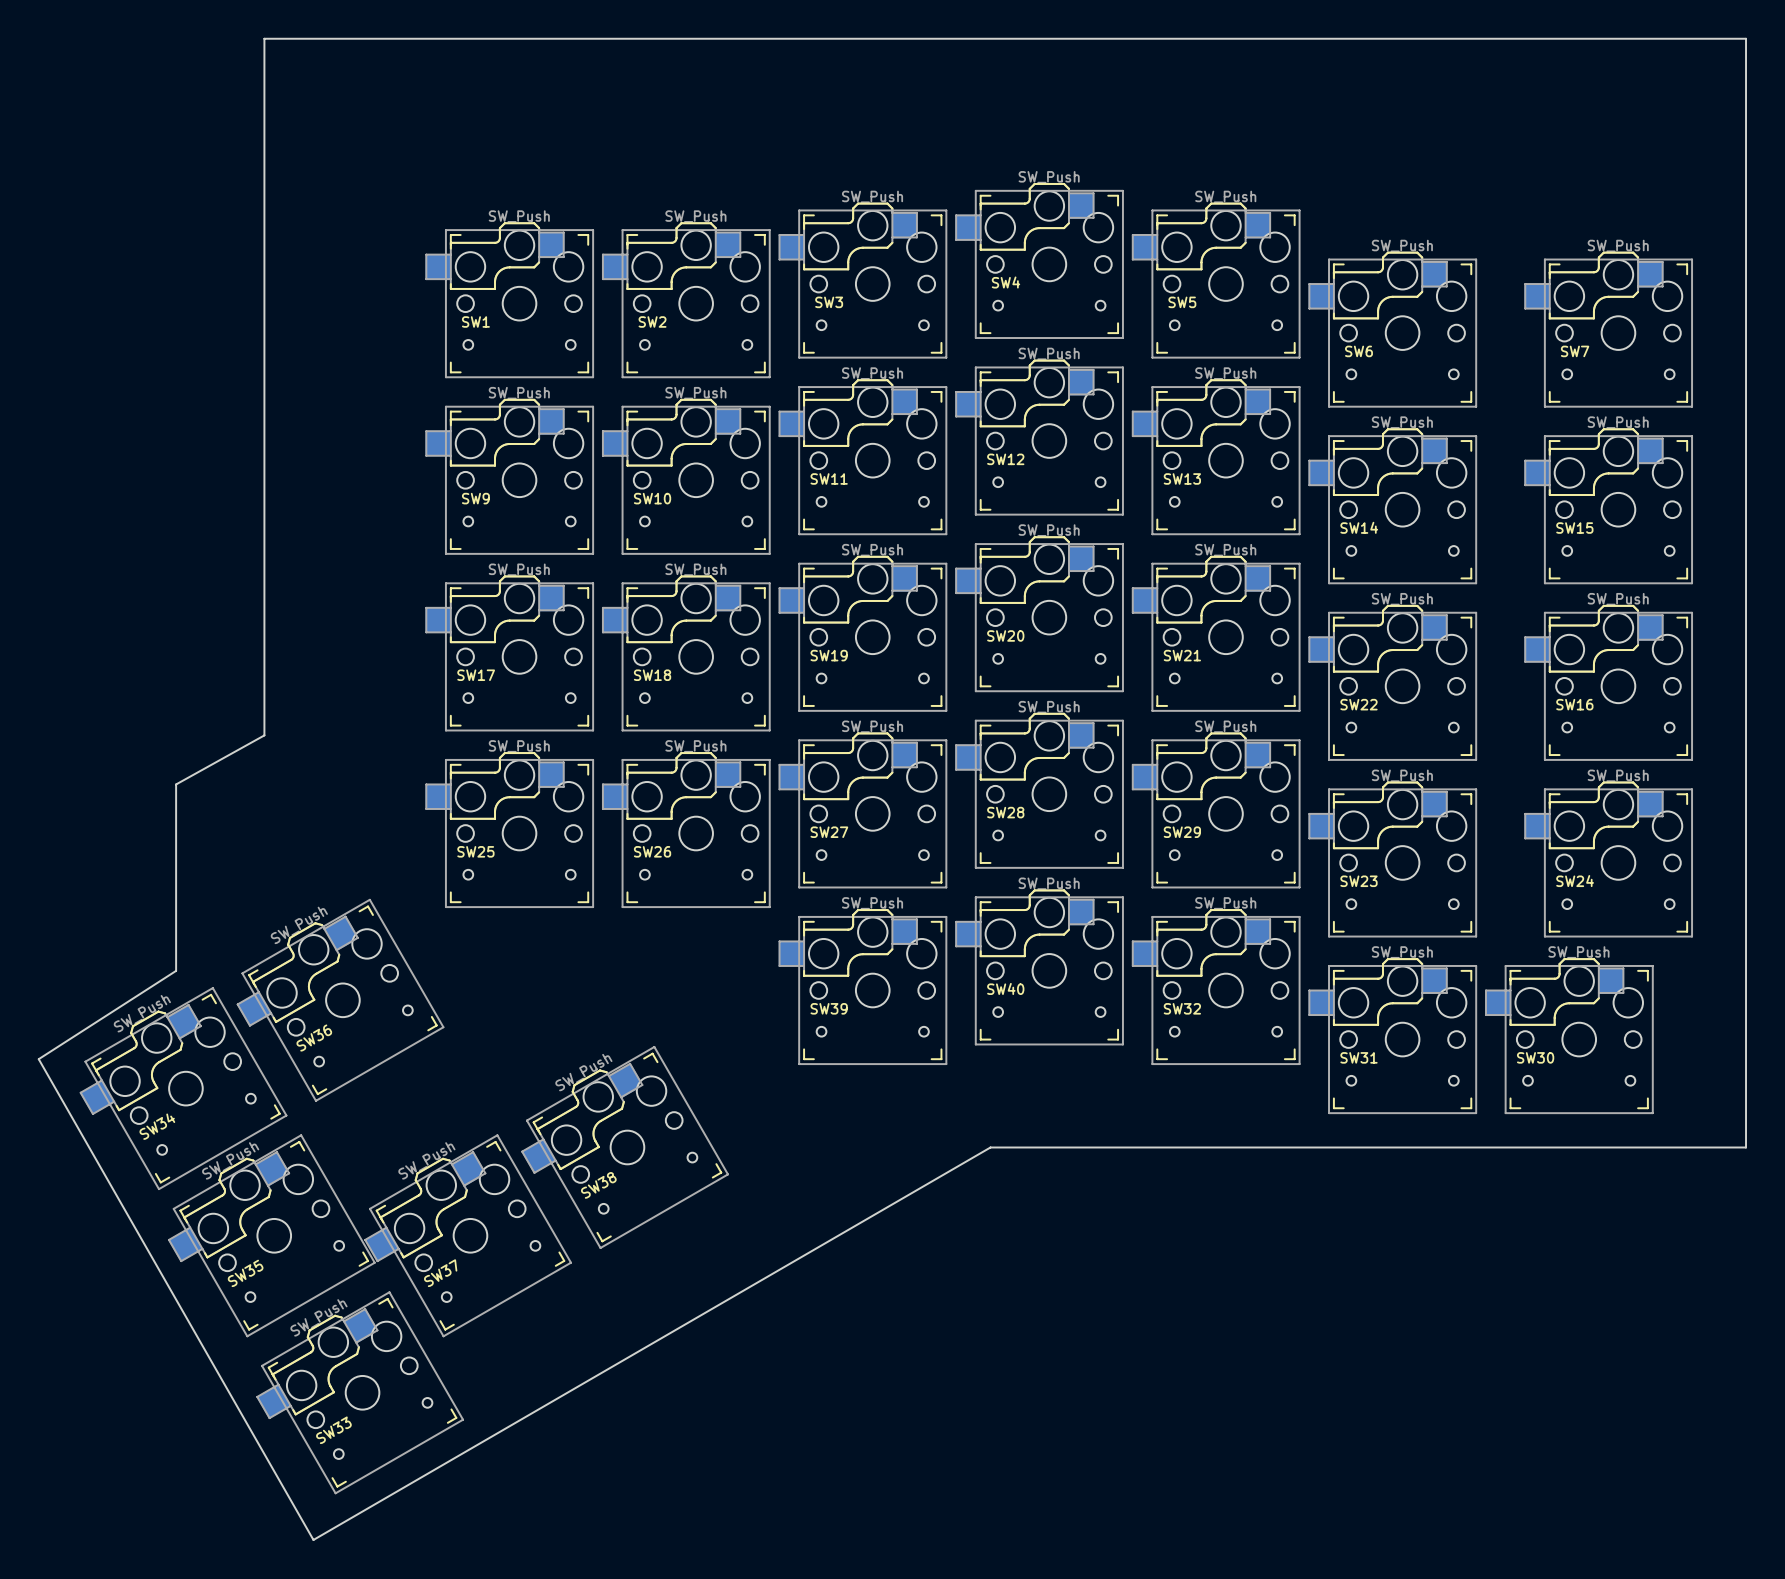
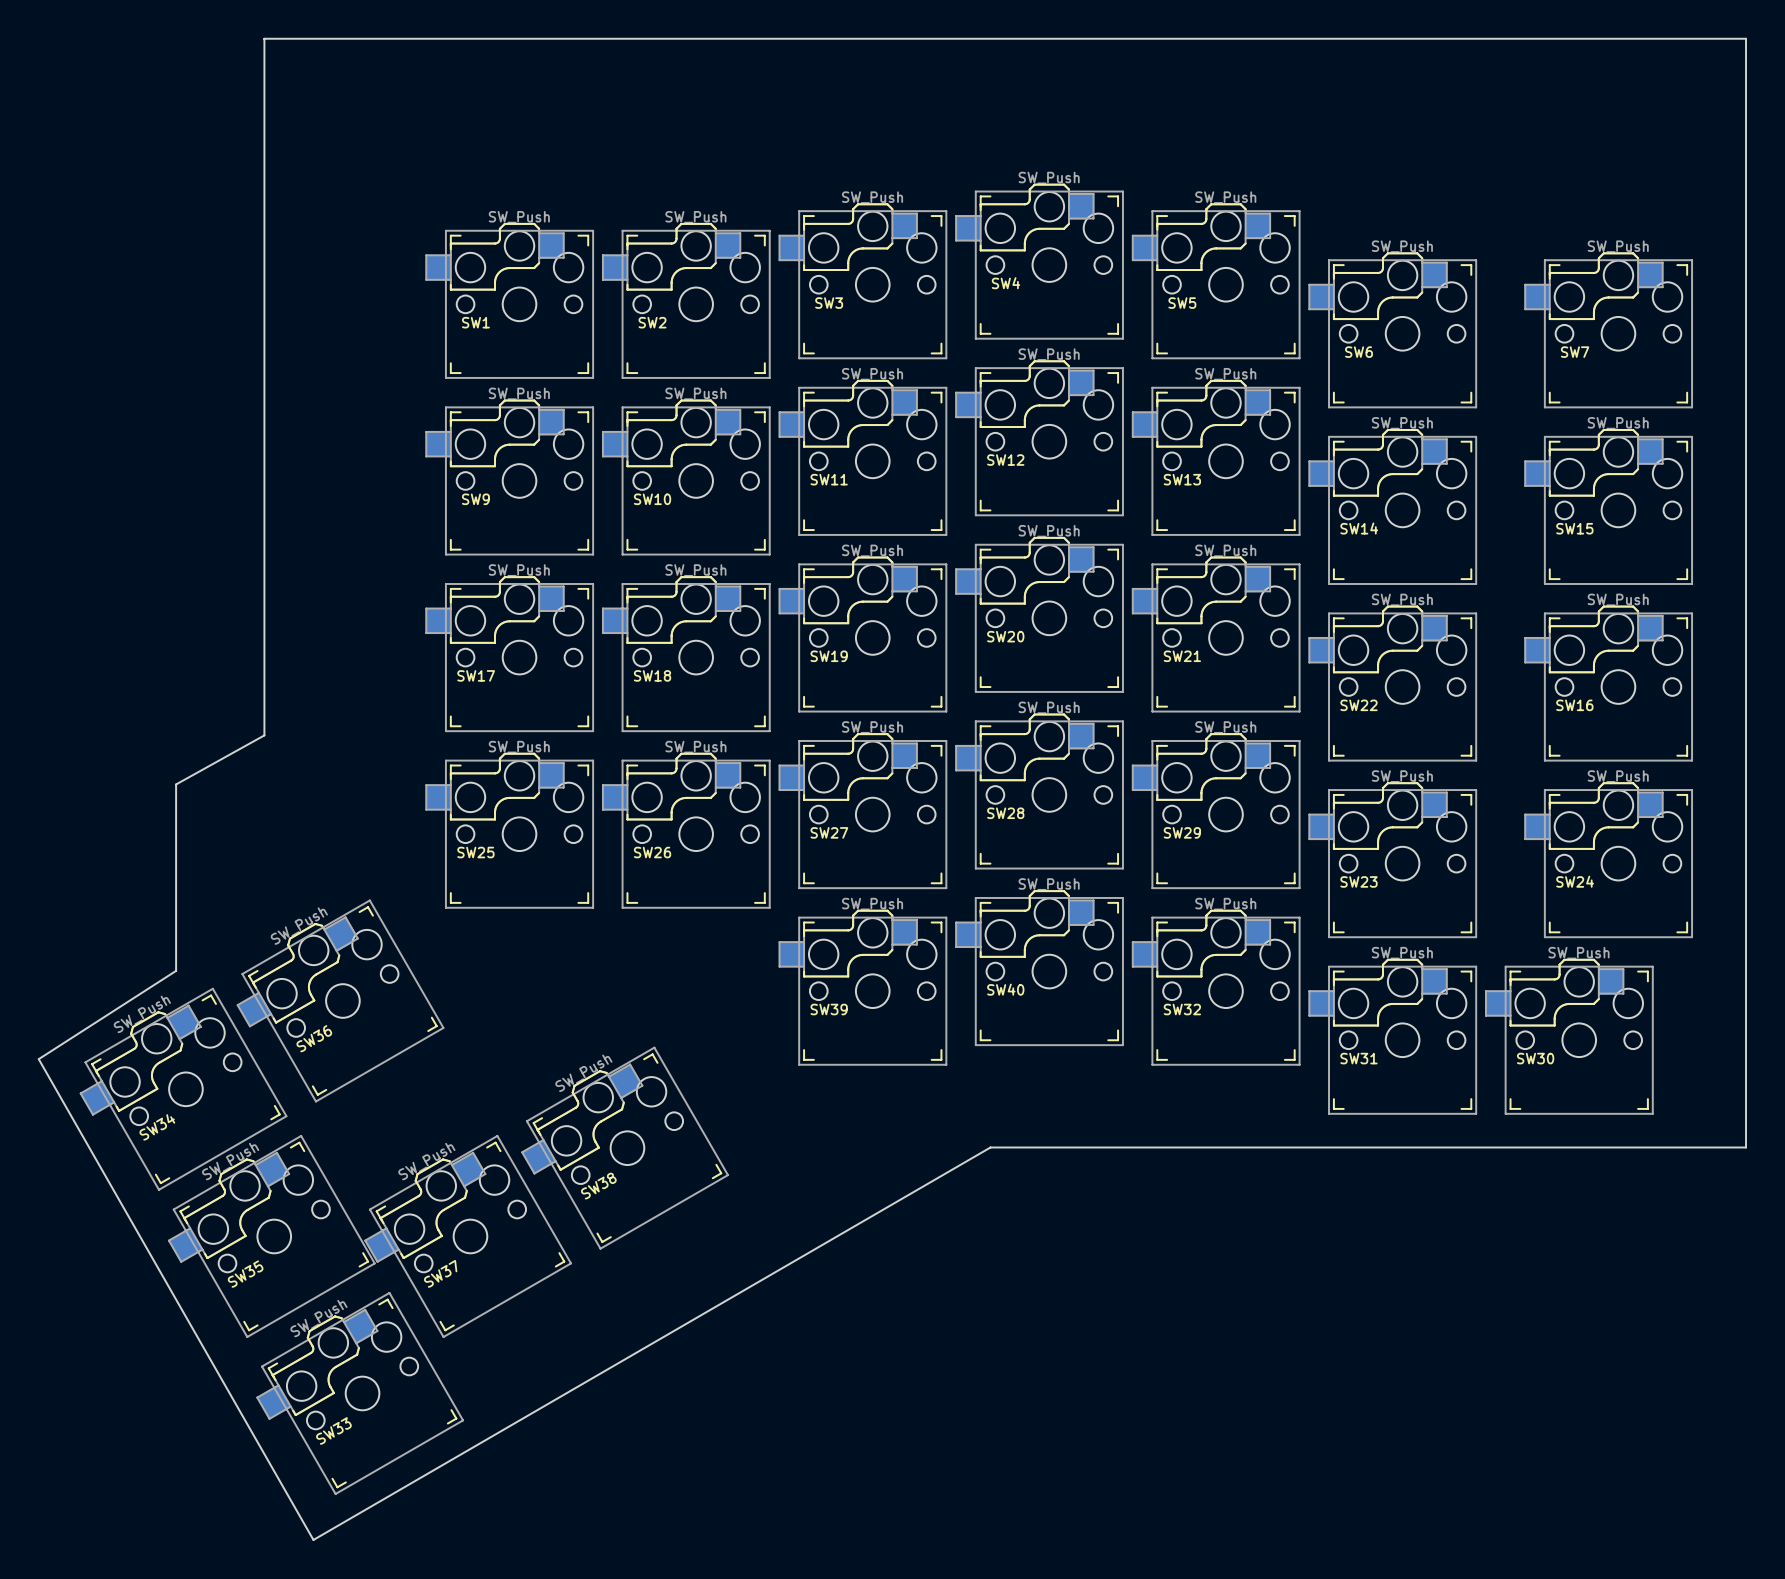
SW4 footprint: [955, 183, 1124, 339] -> [955, 183, 1124, 340]
SW3 footprint: [778, 202, 948, 359] -> [778, 203, 948, 360]
SW5 footprint: [1132, 202, 1301, 359] -> [1132, 203, 1301, 360]
SW1 footprint: [425, 222, 594, 378] -> [425, 223, 594, 379]
SW2 footprint: [602, 222, 771, 378] -> [602, 223, 771, 379]
SW6 footprint: [1308, 251, 1477, 408] -> [1308, 252, 1477, 409]
SW7 footprint: [1524, 251, 1693, 408] -> [1524, 252, 1693, 409]
SW12 footprint: [955, 359, 1124, 516] -> [955, 360, 1124, 517]
SW11 footprint: [778, 379, 948, 535] -> [778, 380, 948, 536]
SW13 footprint: [1132, 379, 1301, 535] -> [1132, 380, 1301, 536]
SW9 footprint: [425, 399, 594, 555] -> [425, 399, 594, 556]
SW10 footprint: [602, 399, 771, 555] -> [602, 399, 771, 556]
SW14 footprint: [1308, 428, 1477, 585] -> [1308, 429, 1477, 585]
SW15 footprint: [1524, 428, 1693, 585] -> [1524, 429, 1693, 585]
SW20 footprint: [955, 536, 1124, 692] -> [955, 537, 1124, 693]
SW19 footprint: [778, 556, 948, 712] -> [778, 556, 948, 713]
SW21 footprint: [1132, 556, 1301, 712] -> [1132, 556, 1301, 713]
SW17 footprint: [425, 575, 594, 732] -> [425, 576, 594, 732]
SW18 footprint: [602, 575, 771, 732] -> [602, 576, 771, 732]
SW22 footprint: [1308, 605, 1477, 761] -> [1308, 605, 1477, 762]
SW16 footprint: [1524, 605, 1693, 761] -> [1524, 605, 1693, 762]
SW28 footprint: [955, 713, 1124, 869] -> [955, 713, 1124, 870]
SW27 footprint: [778, 732, 948, 889] -> [778, 733, 948, 889]
SW29 footprint: [1132, 732, 1301, 889] -> [1132, 733, 1301, 889]
SW25 footprint: [425, 752, 594, 908] -> [425, 753, 594, 909]
SW26 footprint: [602, 752, 771, 908] -> [602, 753, 771, 909]
SW23 footprint: [1308, 781, 1477, 938] -> [1308, 782, 1477, 938]
SW24 footprint: [1524, 781, 1693, 938] -> [1524, 782, 1693, 938]
SW40 footprint: [955, 889, 1124, 1046] -> [955, 890, 1124, 1046]
SW36 footprint: [236, 899, 445, 1102] -> [236, 899, 445, 1103]
SW39 footprint: [778, 909, 948, 1065] -> [778, 909, 948, 1066]
SW32 footprint: [1132, 909, 1301, 1065] -> [1132, 909, 1301, 1066]
SW31 footprint: [1308, 958, 1477, 1114] -> [1308, 959, 1477, 1115]
SW30 footprint: [1485, 958, 1654, 1114] -> [1485, 959, 1654, 1115]
SW34 footprint: [79, 987, 288, 1190] -> [79, 988, 288, 1191]
SW38 footprint: [521, 1046, 729, 1249] -> [521, 1046, 729, 1250]
SW35 footprint: [168, 1134, 376, 1338] -> [168, 1135, 376, 1338]
SW37 footprint: [364, 1134, 572, 1338] -> [364, 1135, 572, 1338]
SW33 footprint: [256, 1291, 464, 1495] -> [256, 1292, 464, 1495]

